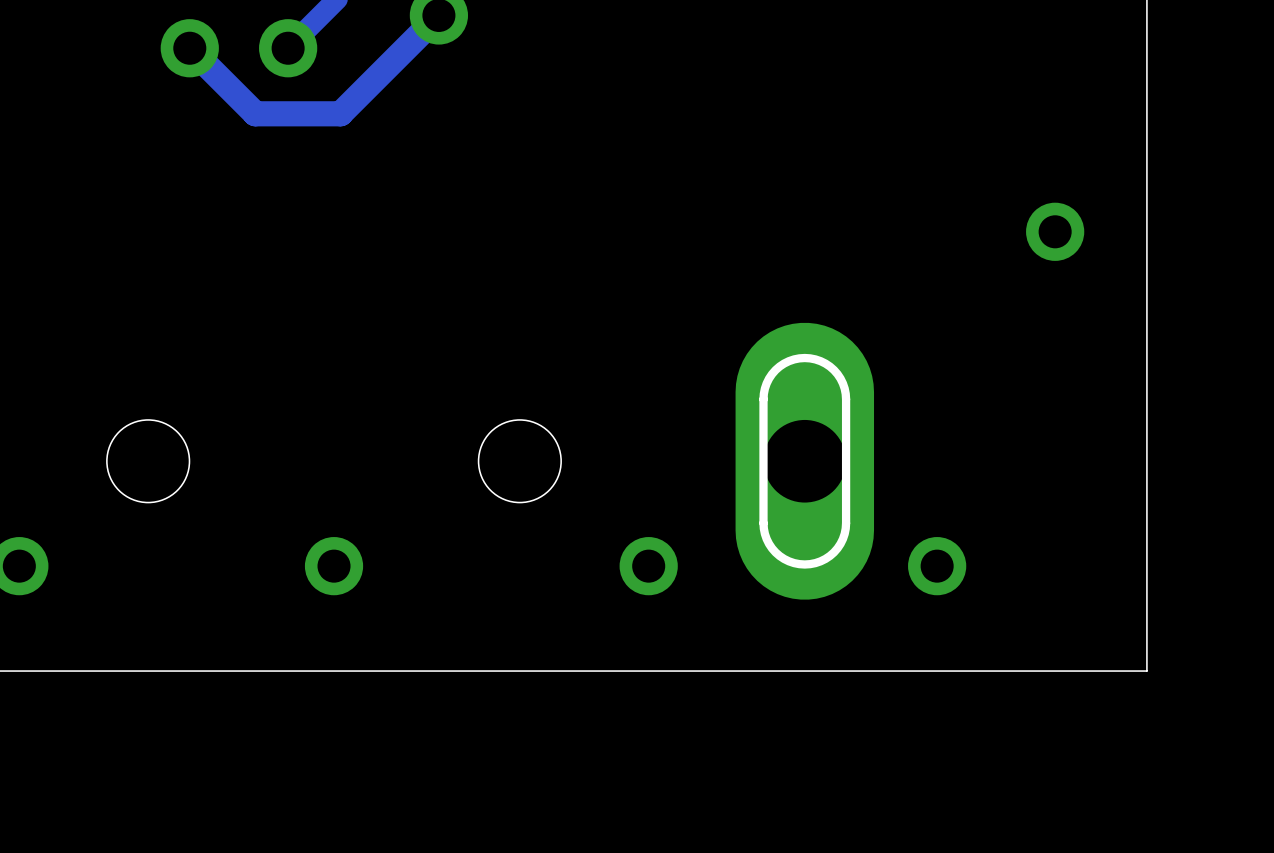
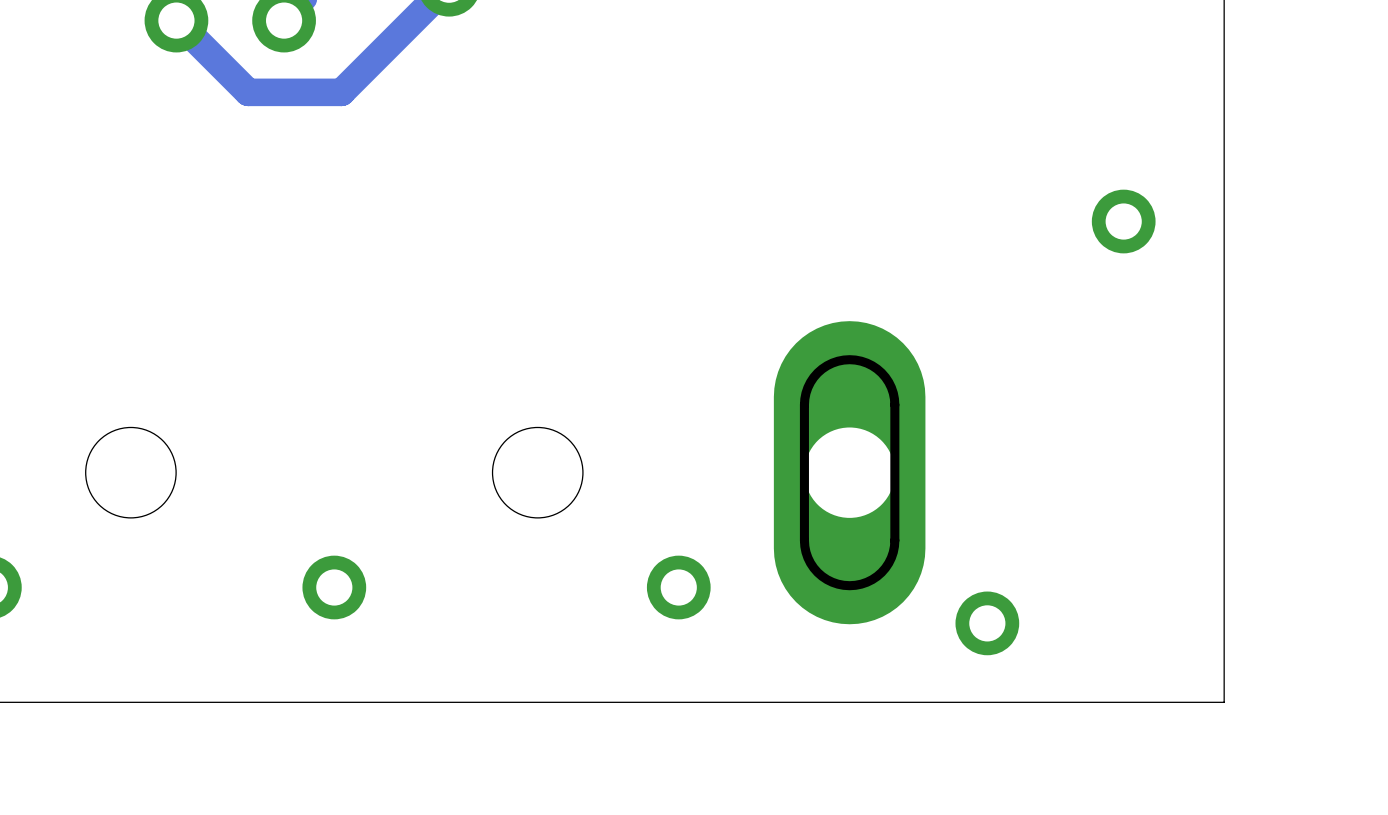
via position: (937, 566) -> (987, 623)

